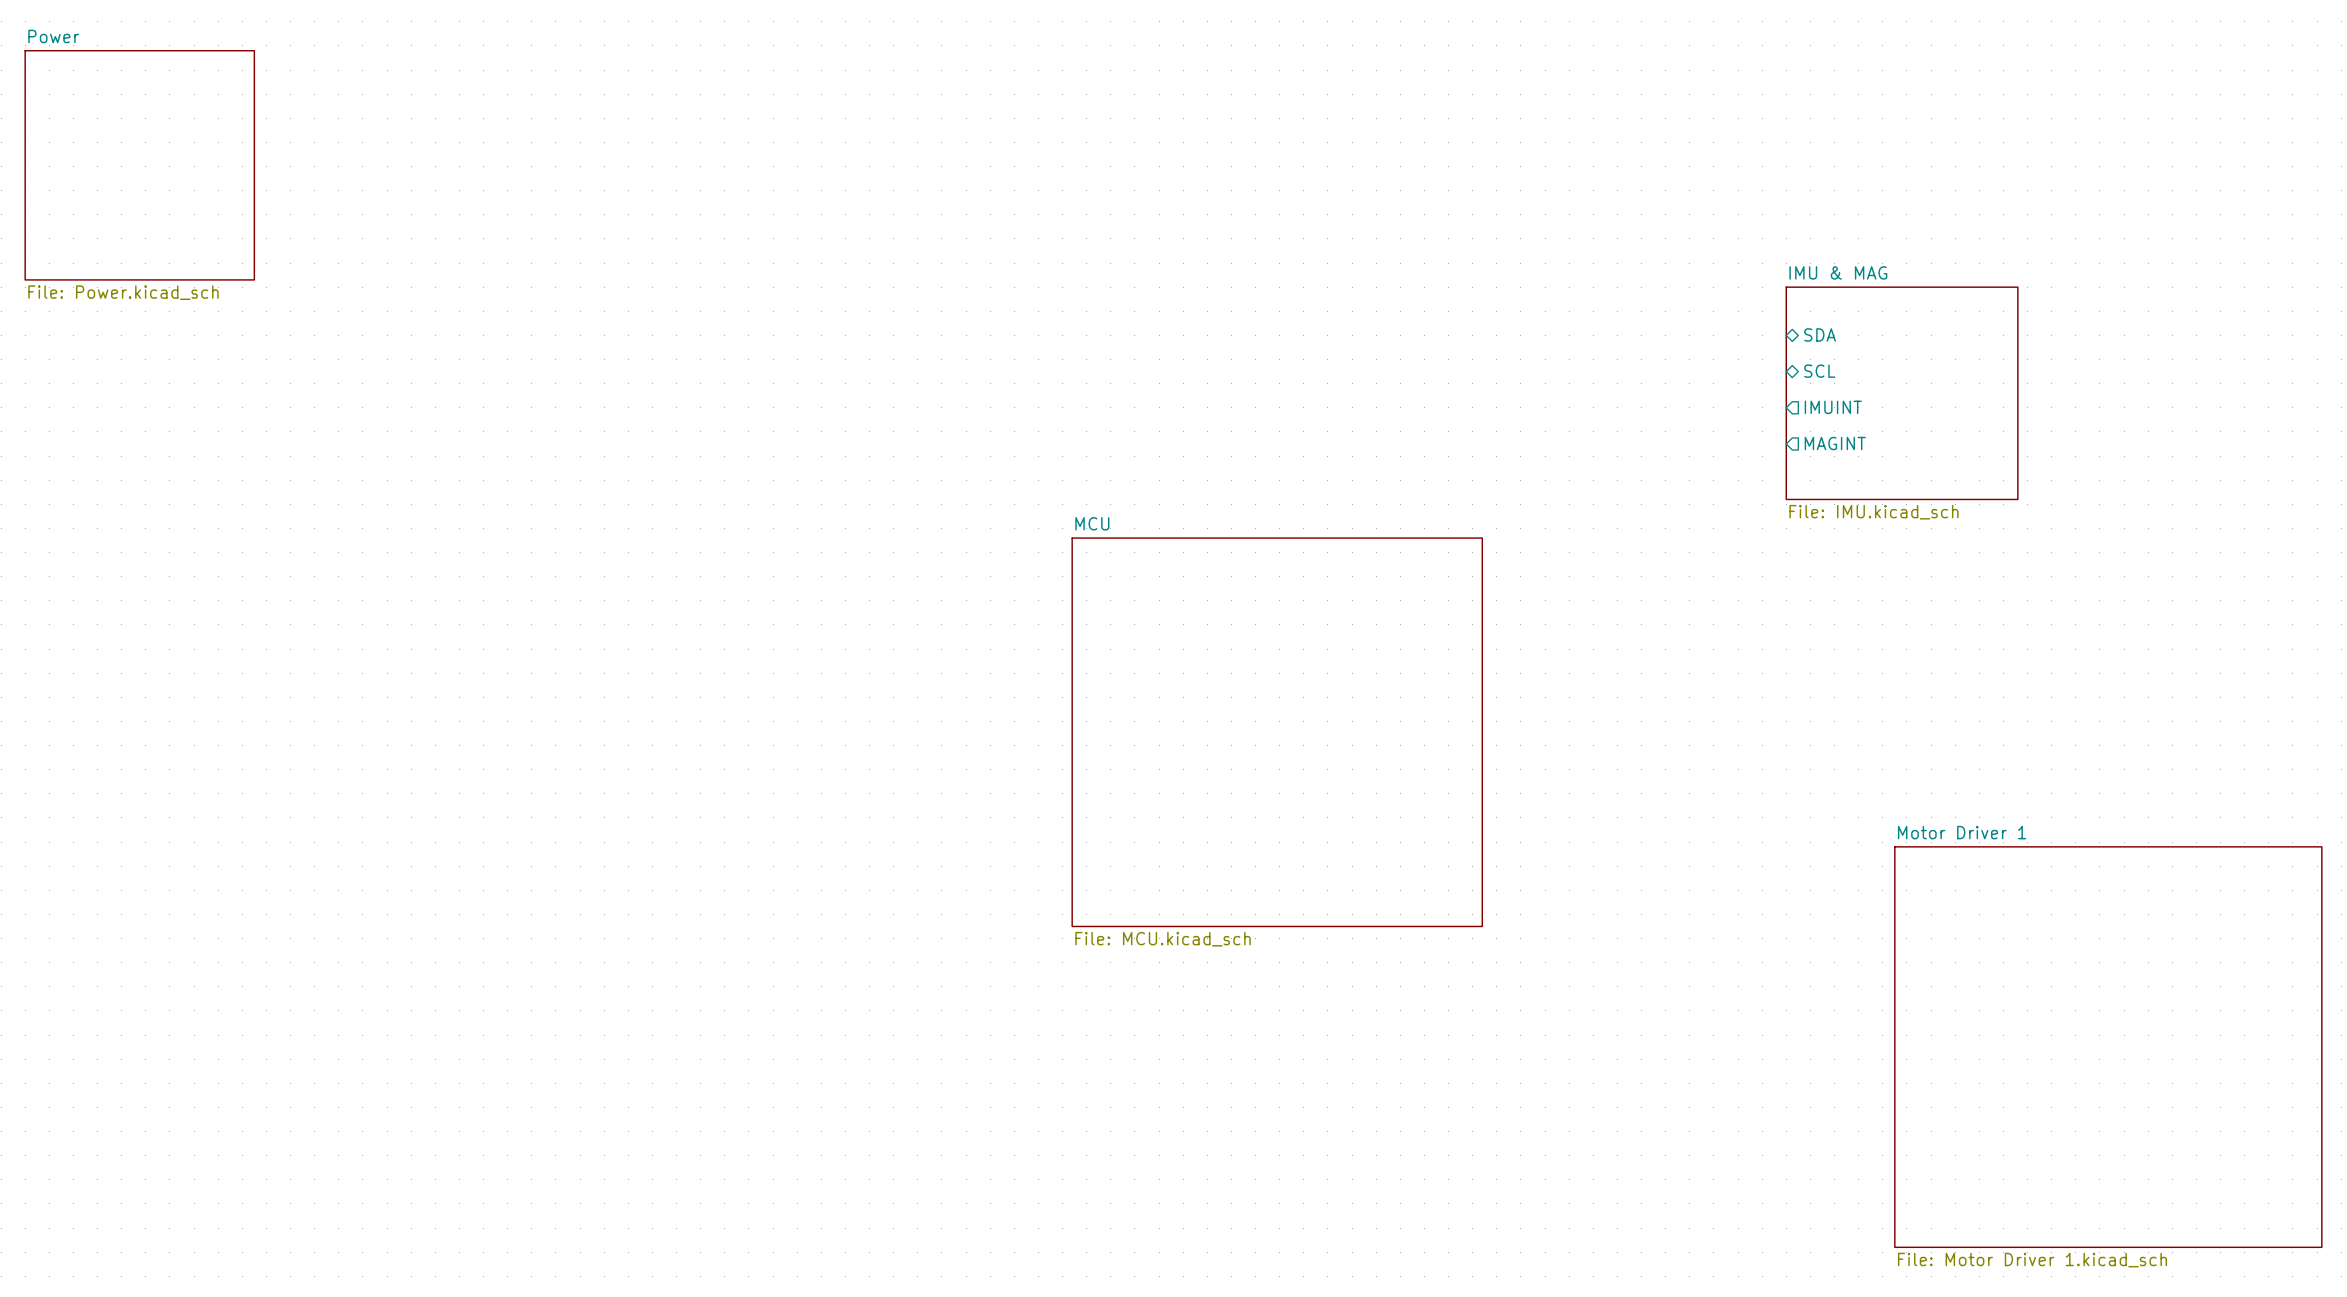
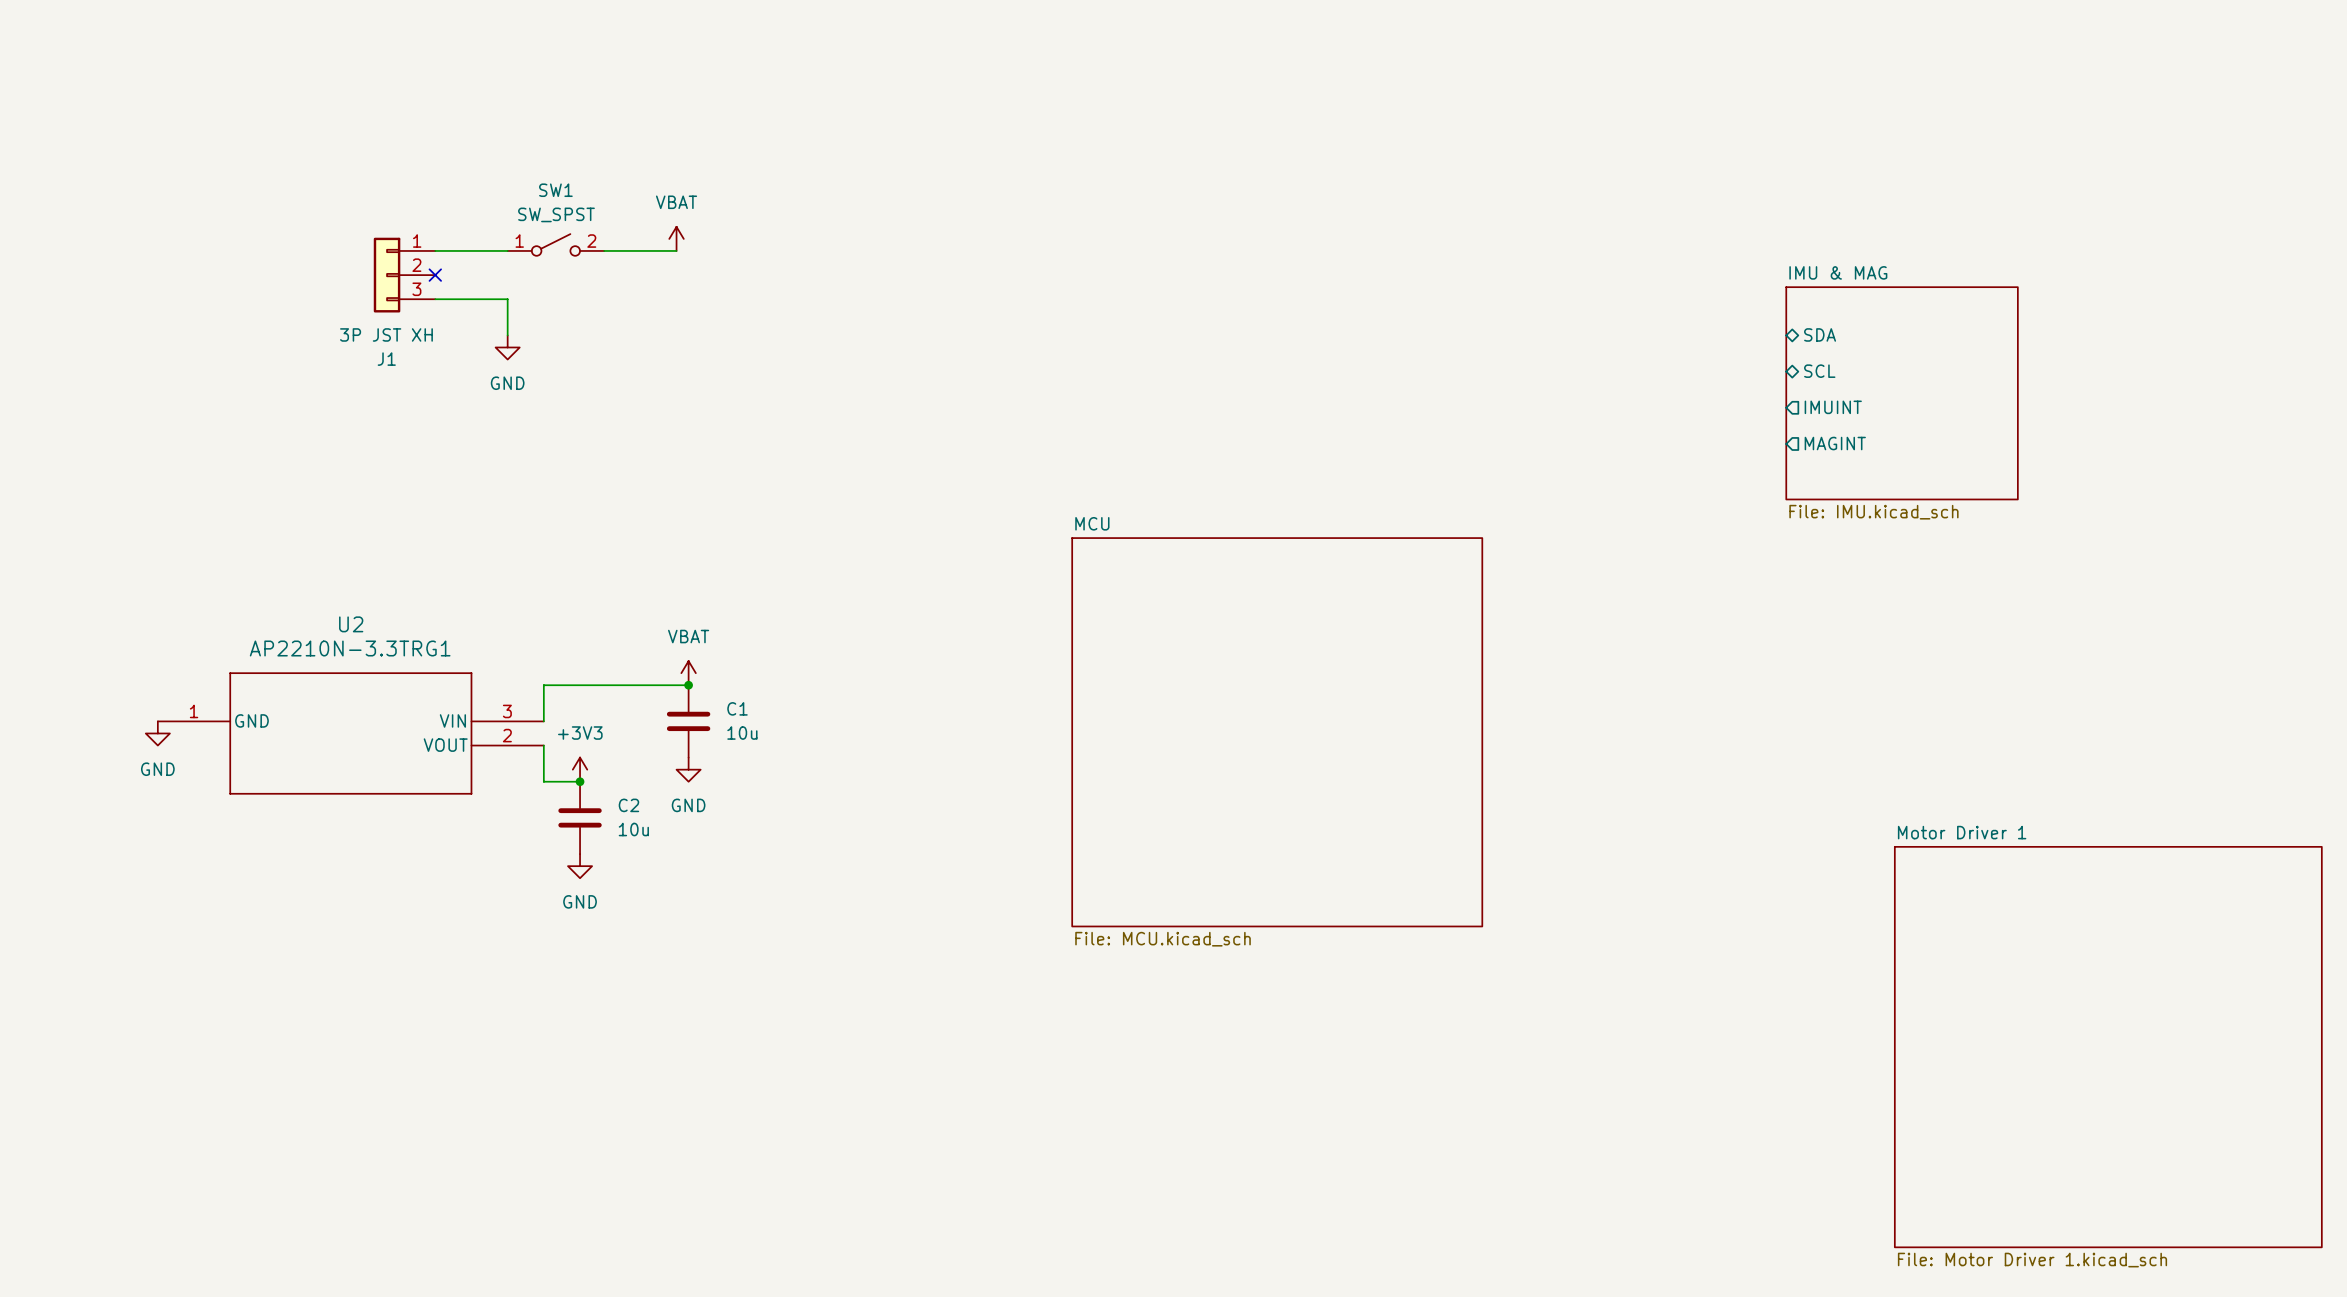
sheet Power: File: Power.kicad_sch (139, 165) -> none
power symbol: none -> VBAT (676, 238)
SW1: none -> SW_SPST (555, 244)
wire: none -> (435, 250) (507, 250)
wire: none -> (604, 250) (676, 250)
J1: none -> 3P JST XH (404, 275)
no-connect mark: none -> (435, 275)
wire: none -> (435, 299) (507, 299) (507, 335)
power symbol: none -> GND (507, 347)
power symbol: none -> VBAT (688, 673)
wire: none -> (688, 685) (543, 685) (543, 721)
junction: none -> (688, 685)
C1: none -> 10u (688, 721)
power symbol: none -> GND (157, 733)
U2: none -> AP2210N-3.3TRG1 (350, 733)
wire: none -> (543, 745) (543, 781) (580, 781)
power symbol: none -> +3V3 (580, 769)
power symbol: none -> GND (688, 769)
junction: none -> (580, 781)
C2: none -> 10u (580, 817)
power symbol: none -> GND (580, 866)

